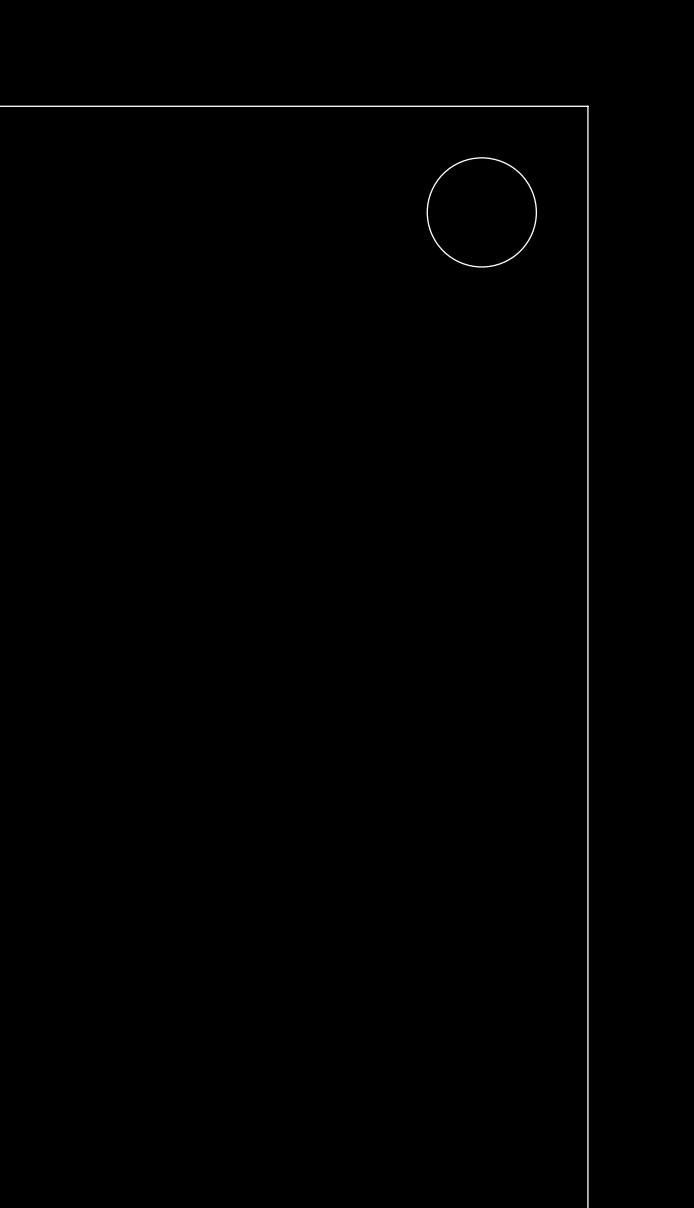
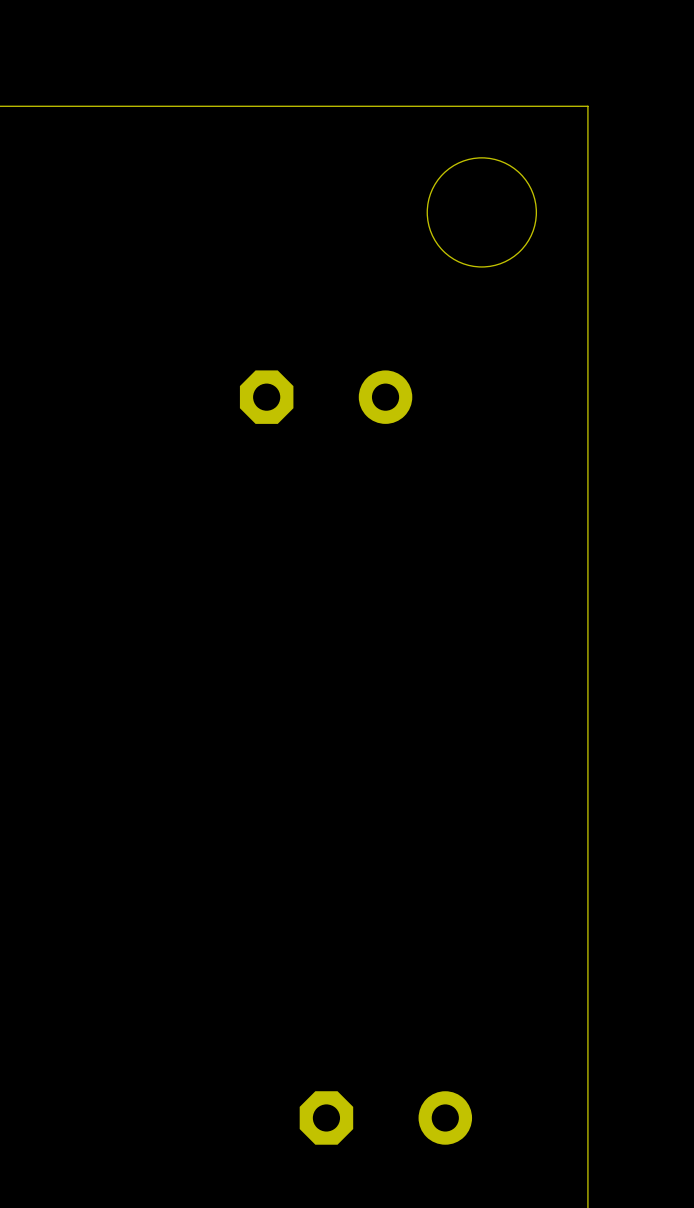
part: none -> (326, 397)
part: none -> (385, 1117)

